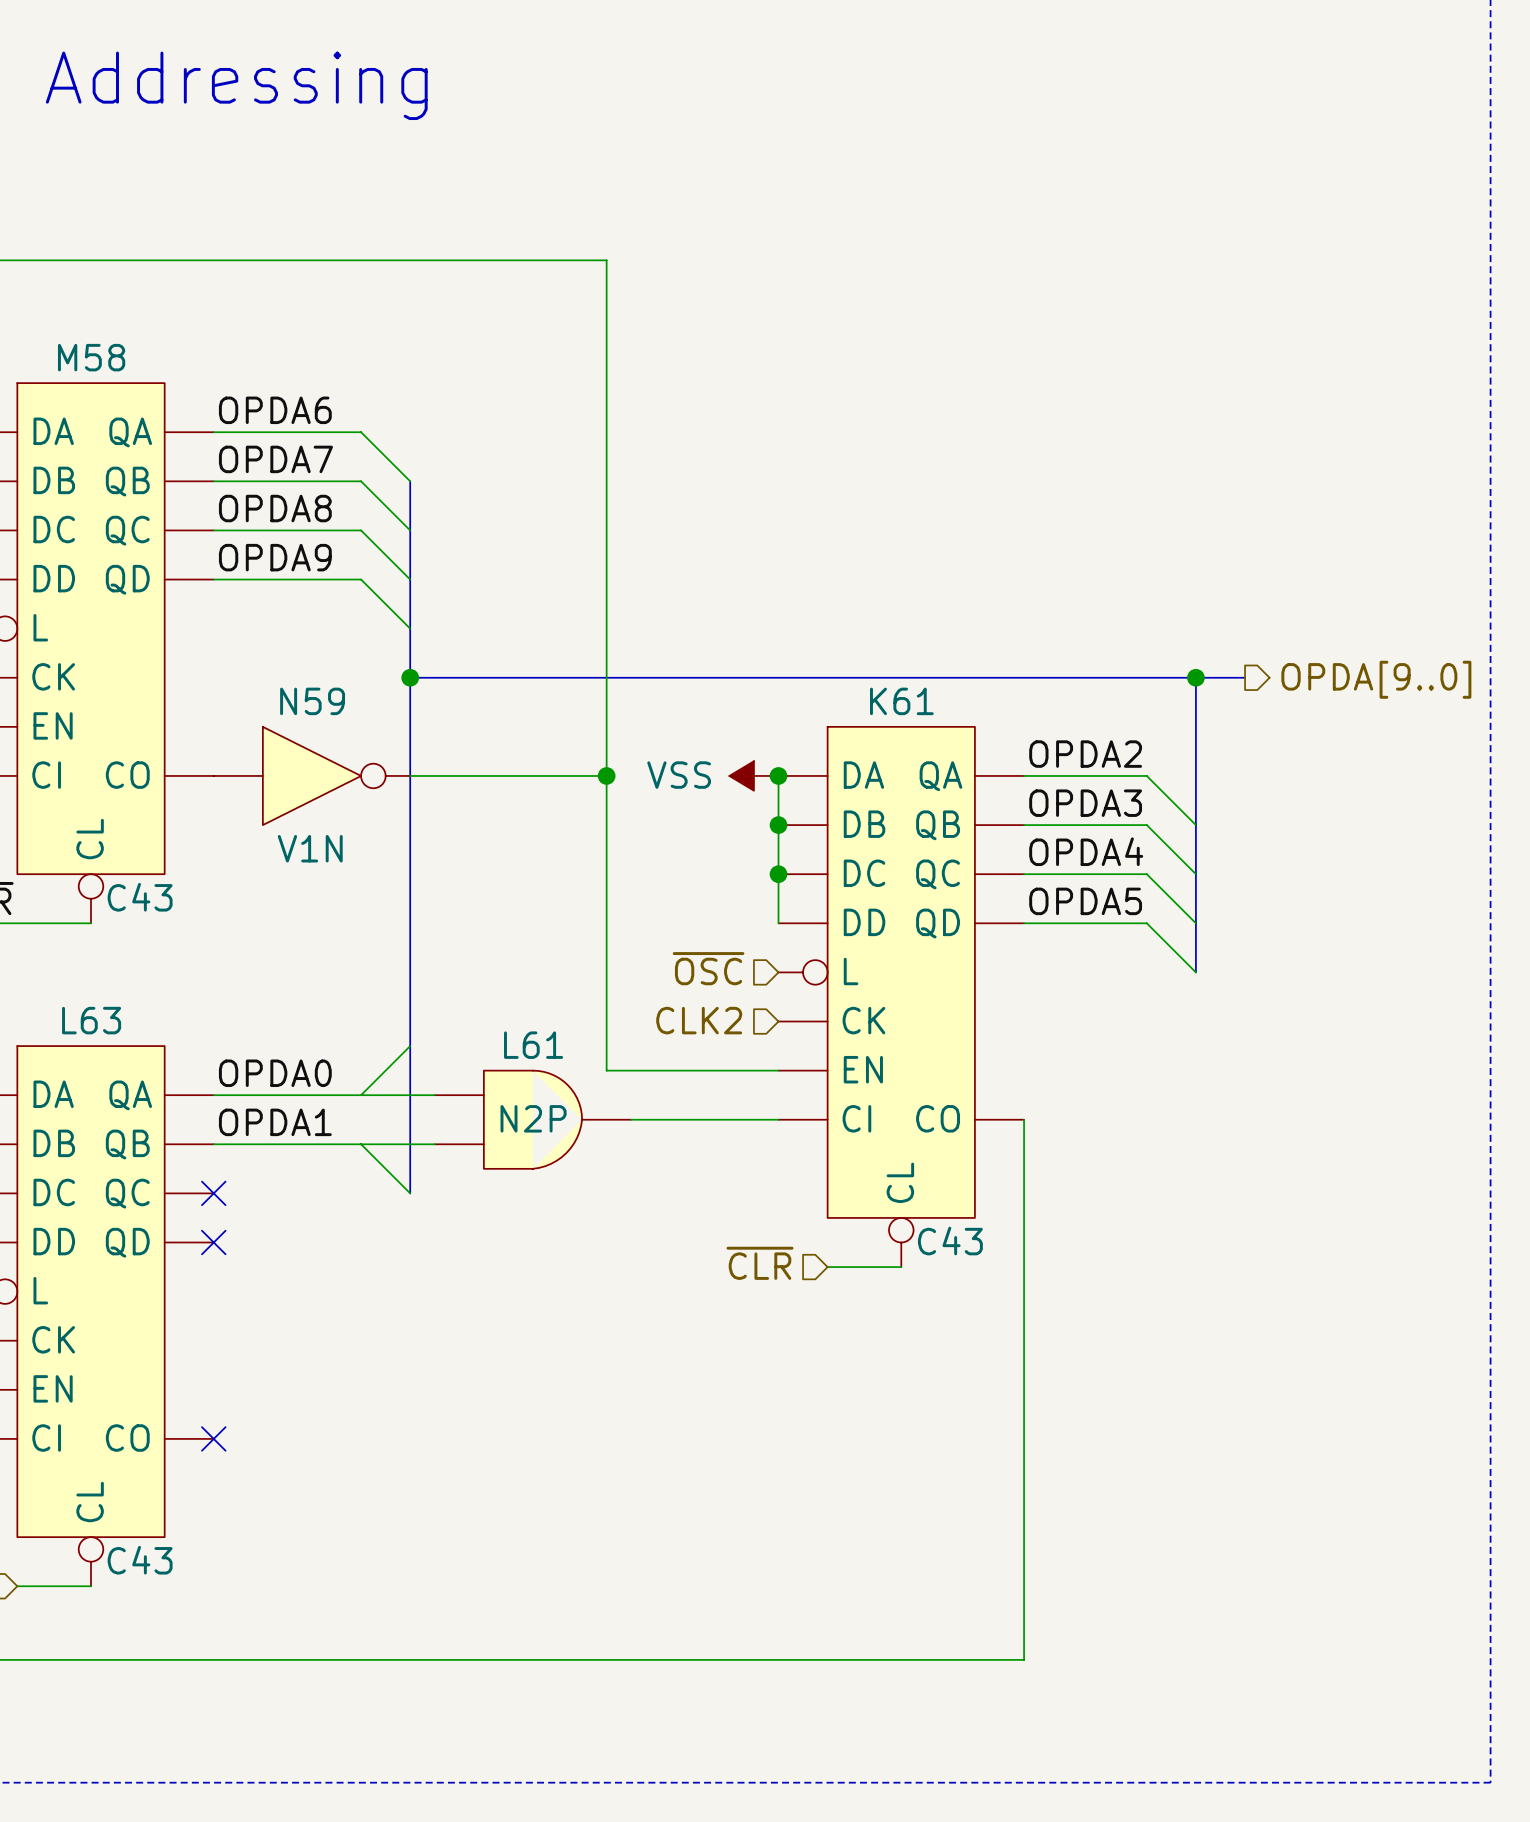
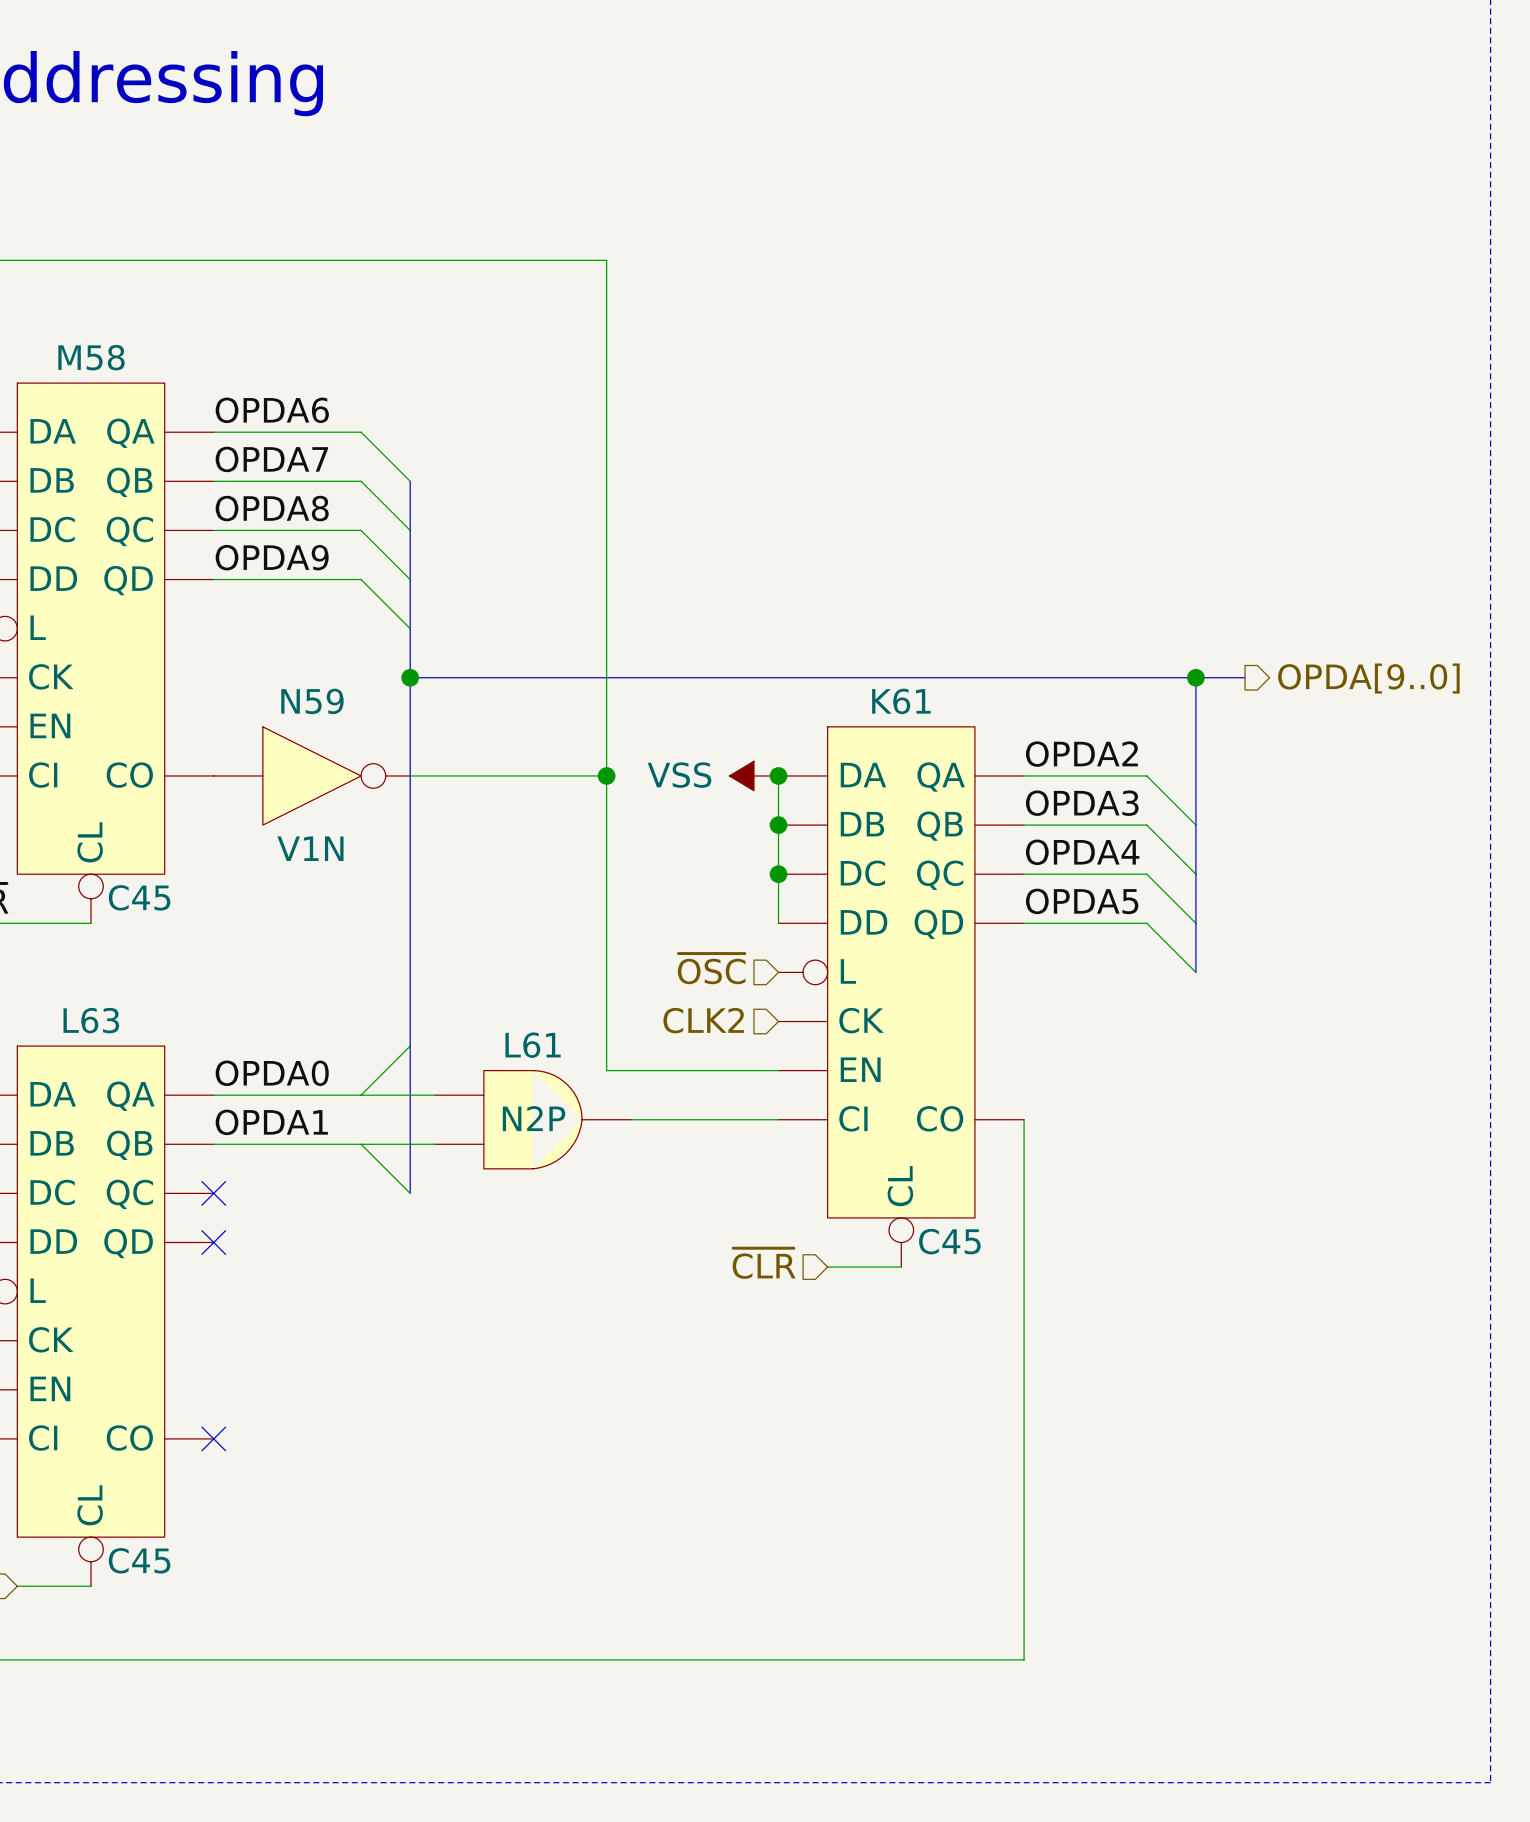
M58 value: C43 (140, 897) -> C45 (139, 897)
K61 value: C43 (950, 1240) -> C45 (949, 1241)
L63 value: C43 (140, 1560) -> C45 (139, 1560)

